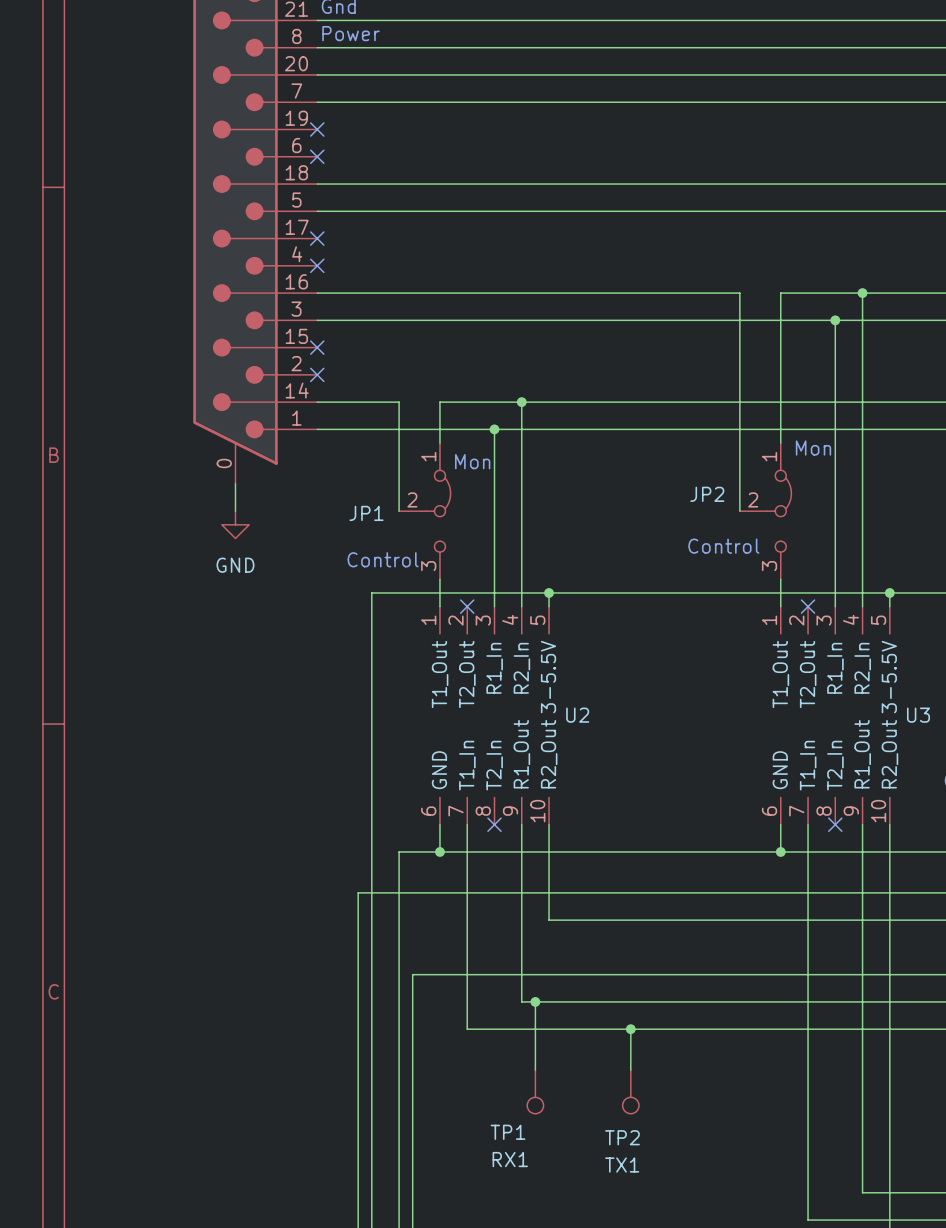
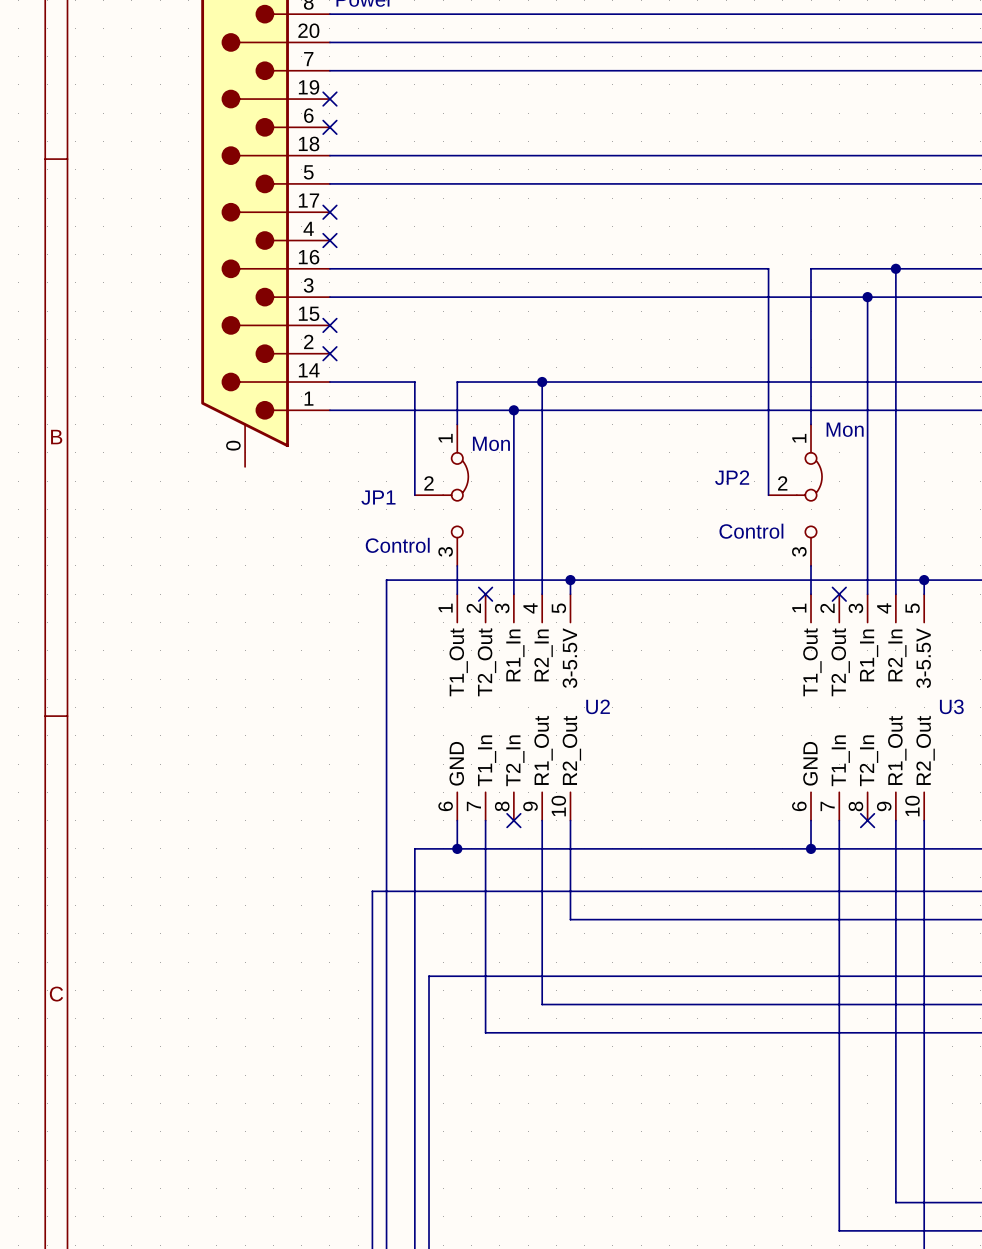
wire: (235, 483) (235, 511) -> none
power symbol: GND (235, 524) -> none
wire: (535, 1001) (535, 1070) -> none
junction: (535, 1001) -> none
wire: (630, 1029) (630, 1070) -> none
junction: (630, 1029) -> none
TP1: RX1 (535, 1091) -> none
TP2: TX1 (630, 1091) -> none

